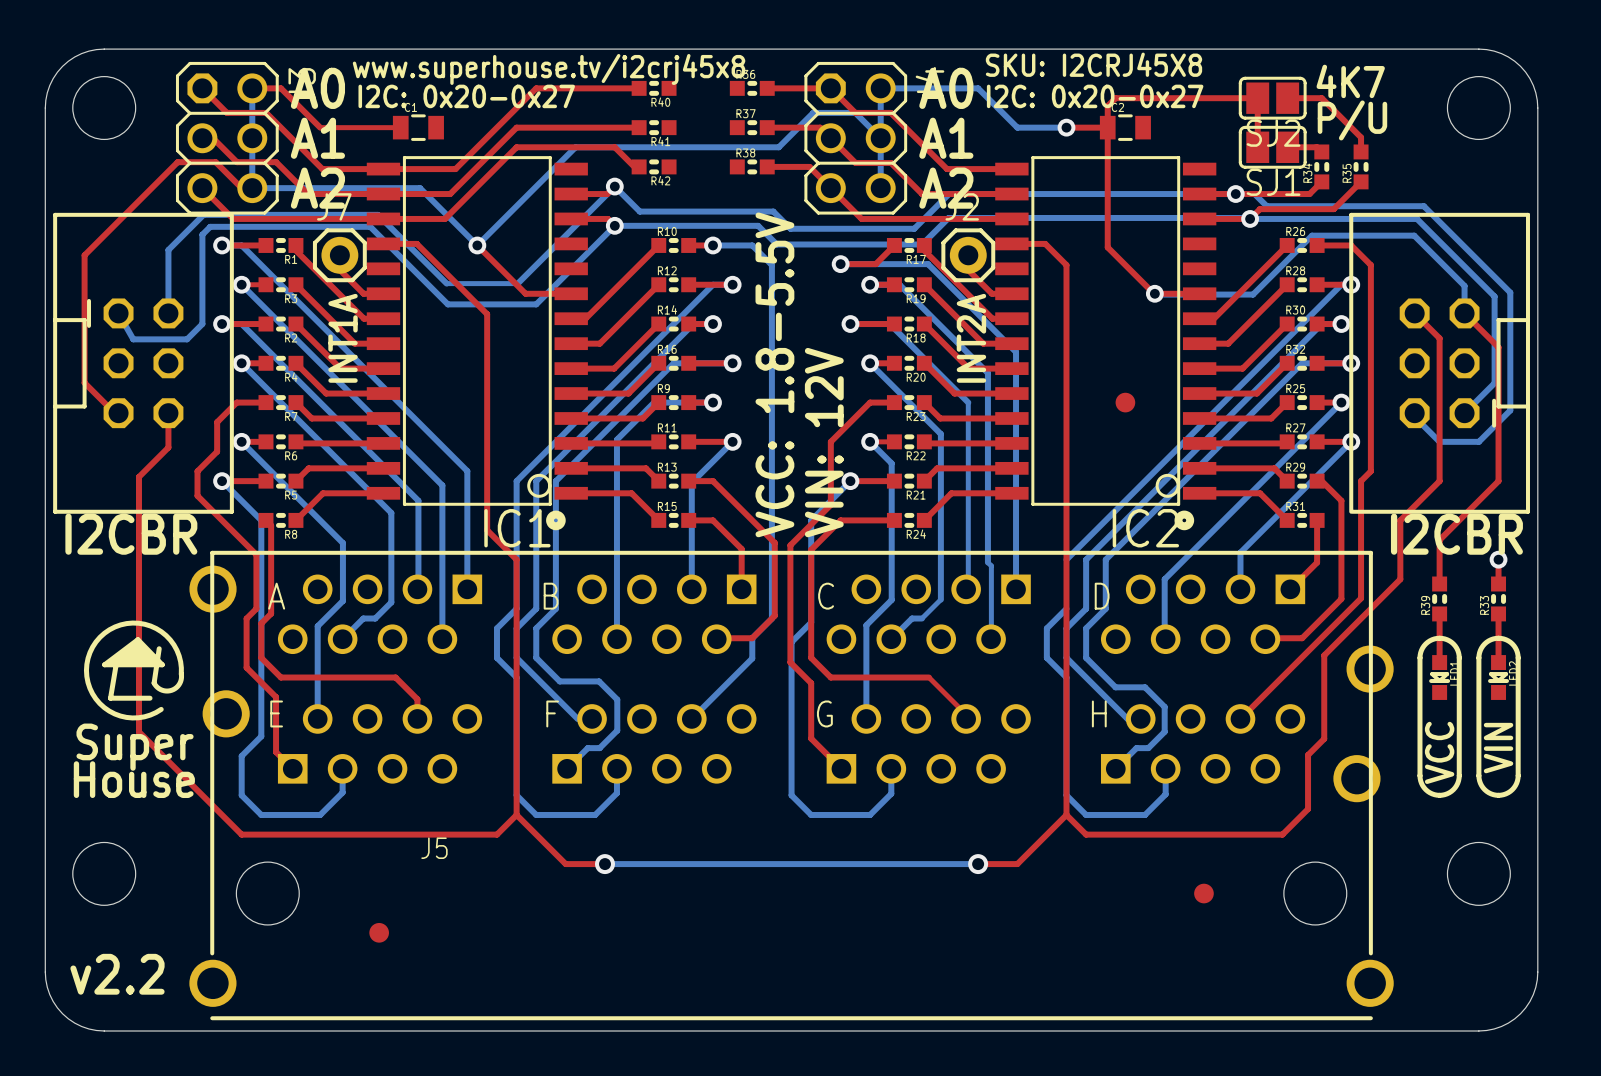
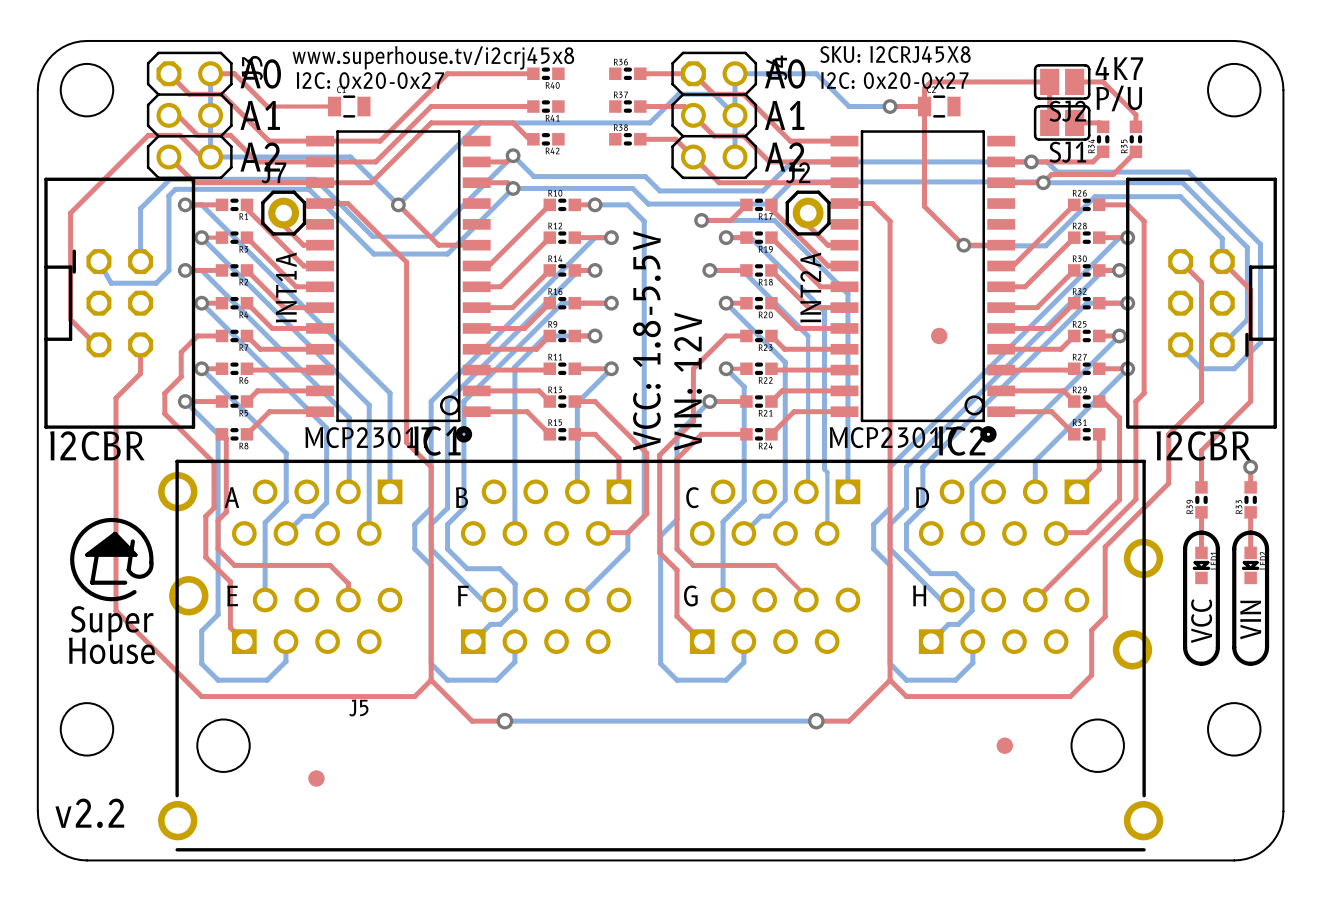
text: none -> MCP23017 (368, 437)
text: none -> MCP23017 (893, 437)

